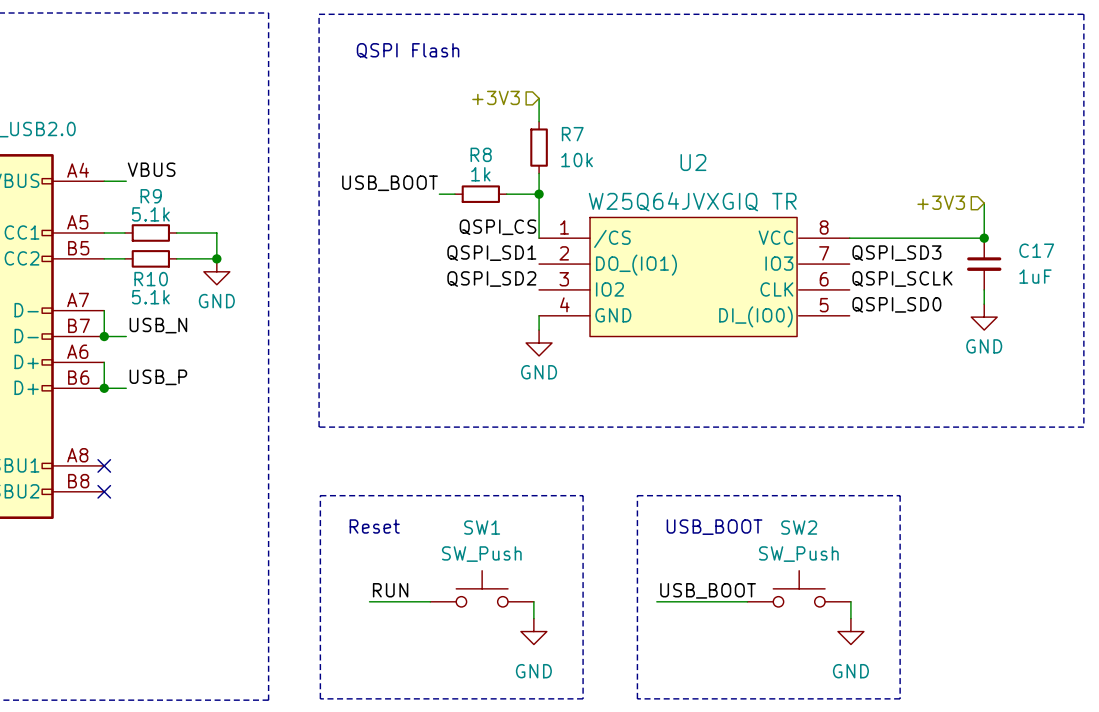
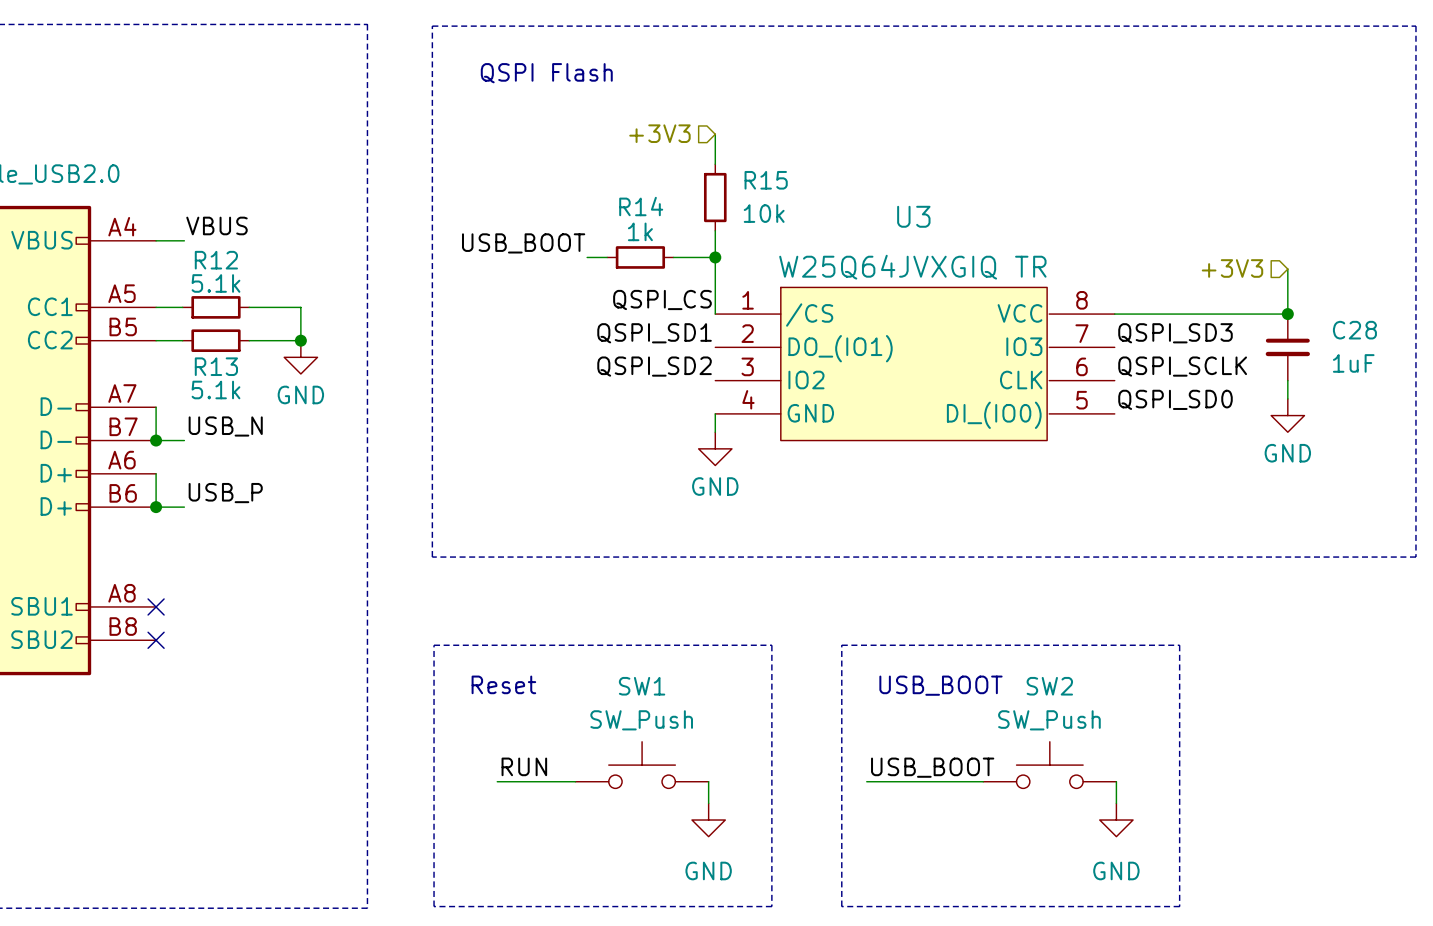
R7 name: R7 (572, 134) -> R15 (766, 180)
R8 name: R8 (481, 154) -> R14 (641, 206)
U2 name: U2 (693, 162) -> U3 (913, 216)
R9 name: R9 (151, 196) -> R12 (216, 260)
C17 name: C17 (1036, 250) -> C28 (1354, 330)
R10 name: R10 (151, 279) -> R13 (216, 366)

